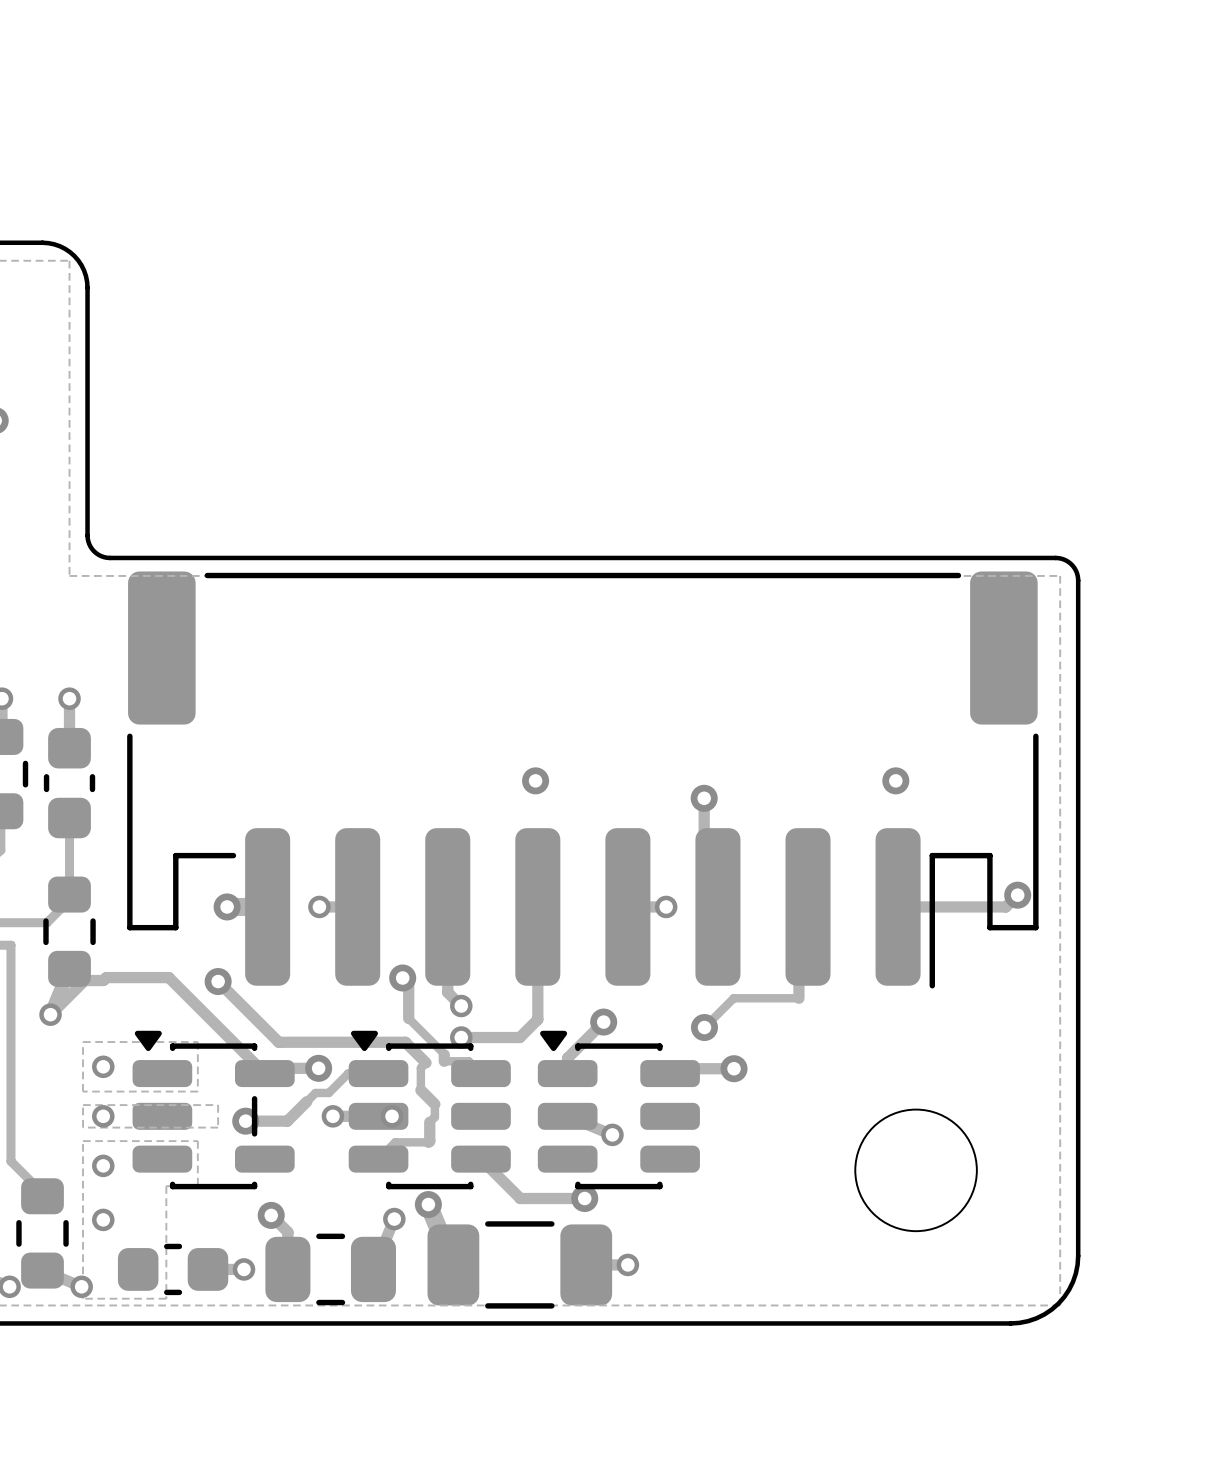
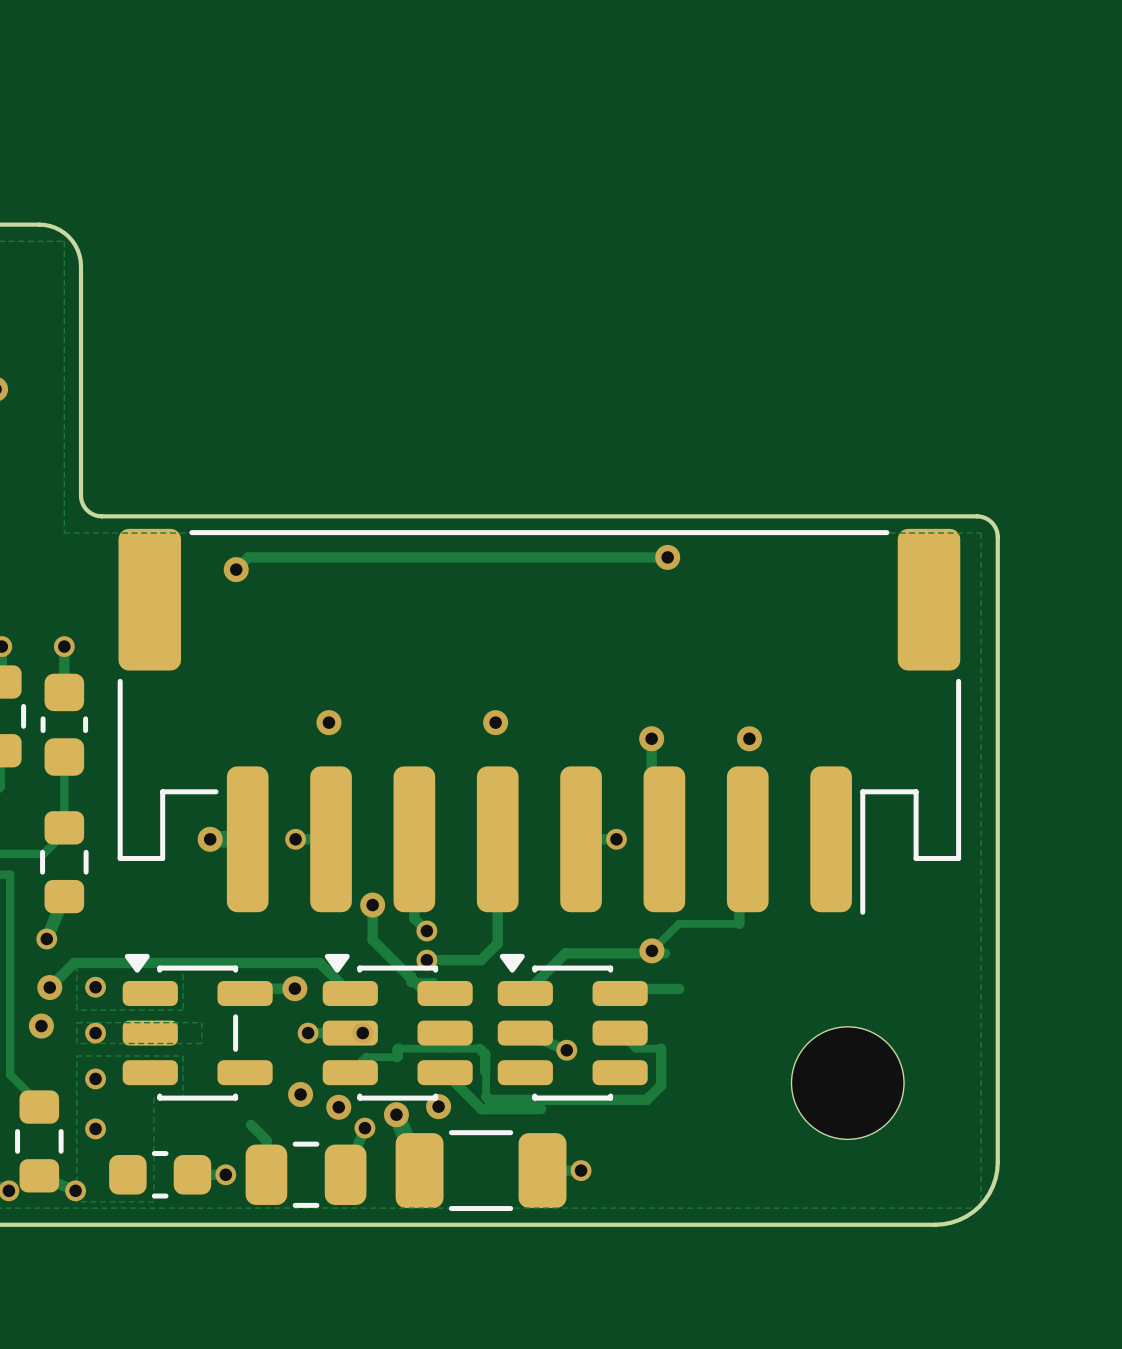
track: none -> (667, 557) (248, 557) (236, 569)
via: none -> (667, 557)
via: none -> (236, 569)
via: none -> (328, 722)
via position: (895, 780) -> (749, 738)
track: (1017, 895) (1005, 906) (898, 906) -> none
via: (1017, 895) -> none
track: (402, 977) (408, 984) (408, 1018) (444, 1054) -> (372, 905) (372, 939) (426, 993) (445, 993)
track: (218, 981) (278, 1042) (405, 1042) (426, 1062) (420, 1068) (420, 1090) (434, 1104) (434, 1117) (429, 1122) (429, 1134) -> (479, 1048) (397, 1049)
via: (218, 981) -> none
track: (50, 1014) (84, 980) (103, 980) (106, 977) (168, 977) (264, 1073) -> none
track: (603, 1022) (567, 1058) (567, 1073) -> (665, 953) (565, 953) (525, 993)
via: (603, 1022) -> none
via: none -> (49, 987)
via: (734, 1068) -> none
track: (378, 1073) (348, 1073) (328, 1092) (315, 1092) (287, 1121) (245, 1121) -> (350, 993) (319, 962) (74, 962) (49, 987)
via: none -> (41, 1026)
track: none -> (620, 1033) (635, 1048) (661, 1048) (661, 1085) (646, 1099) (489, 1099) (486, 1096) (485, 1054) (479, 1048)
via: (245, 1121) -> none
via: none -> (300, 1094)
via: none -> (438, 1106)
via: none -> (338, 1107)
via: (584, 1198) -> none
via: (271, 1215) -> none

